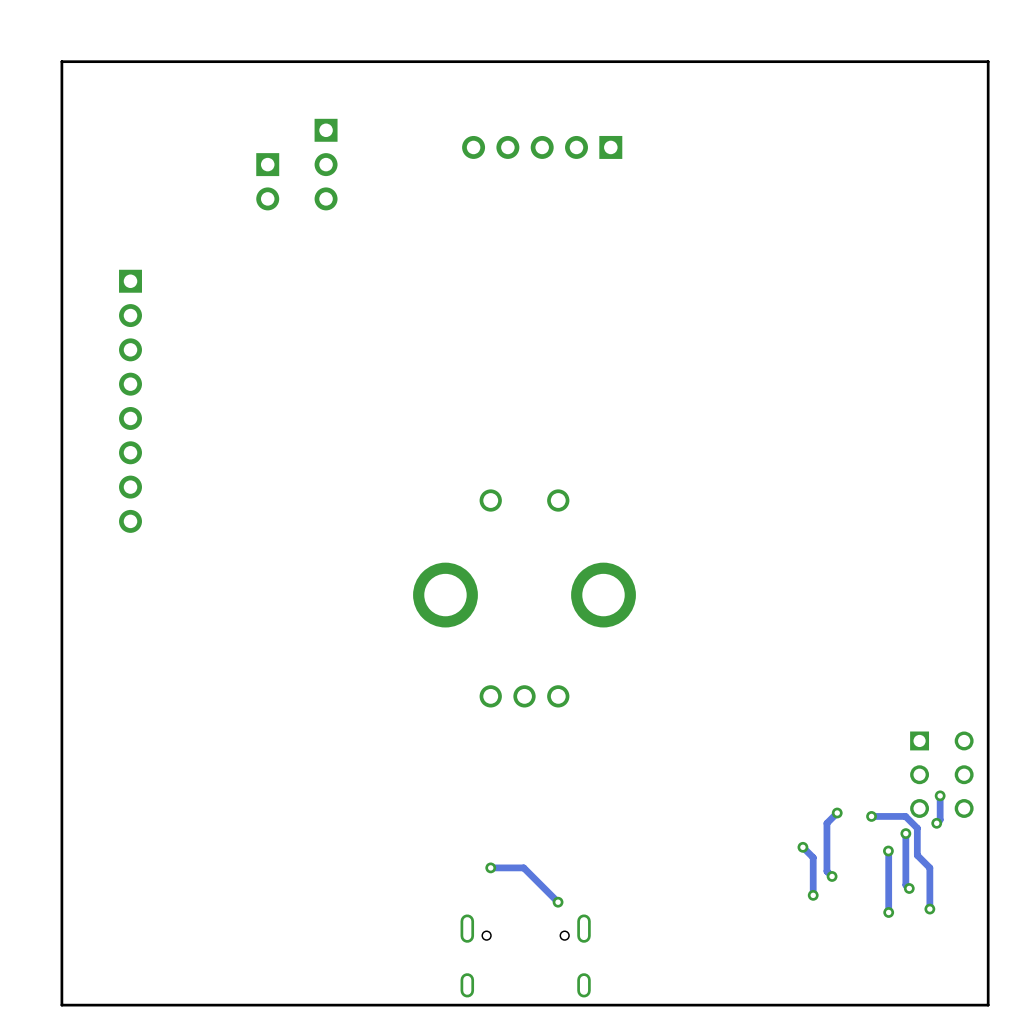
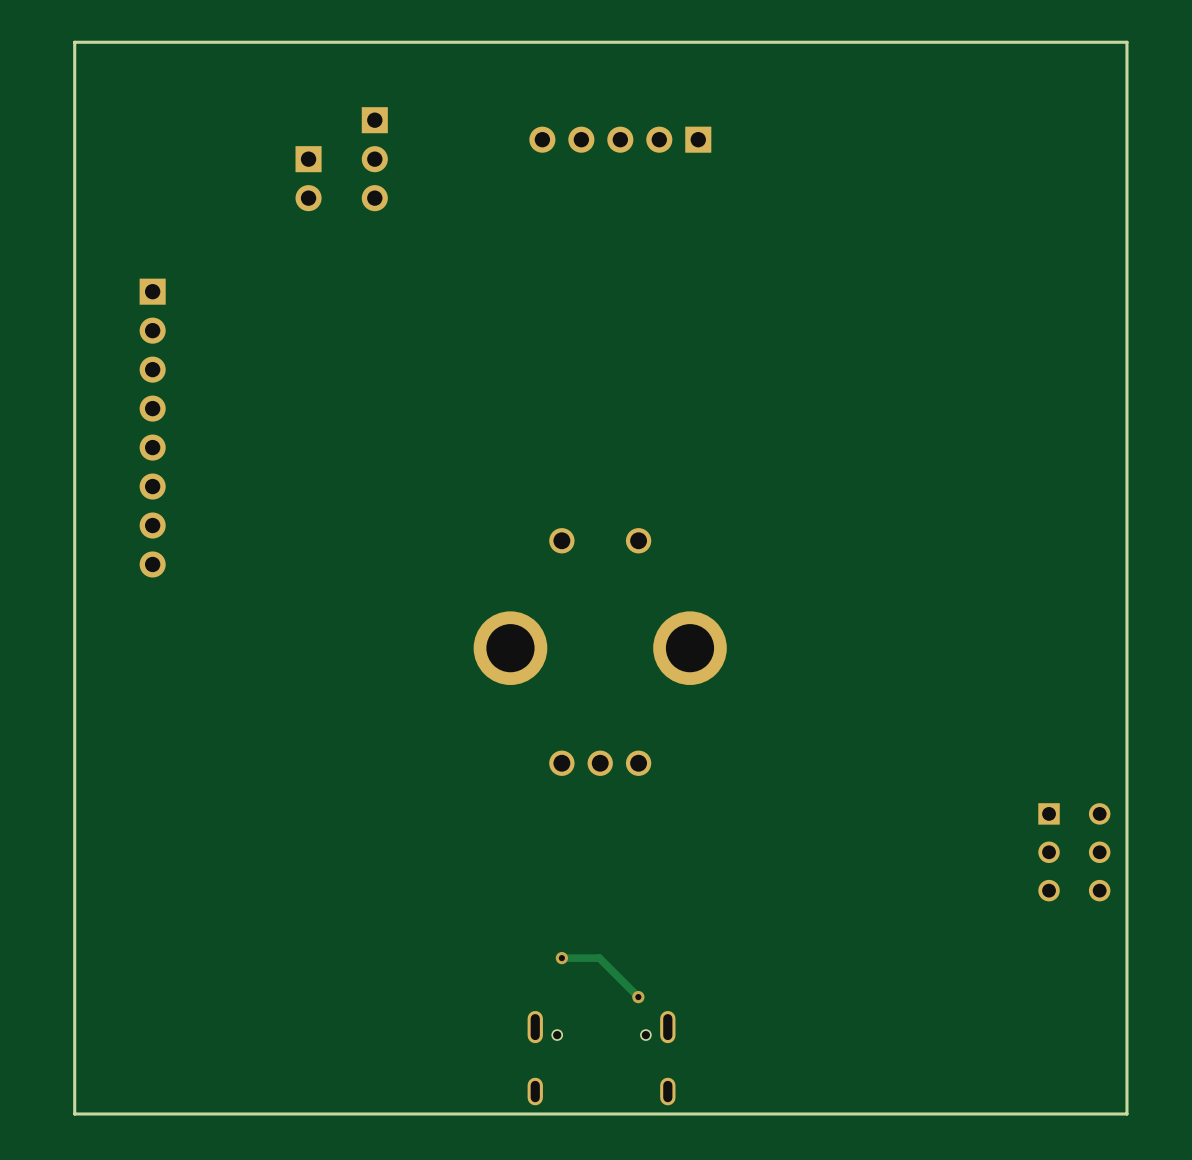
track: (940, 795) (940, 819) (936, 823) -> none
via: (940, 795) -> none
track: (837, 813) (826, 823) (826, 871) (832, 876) -> none
via: (837, 813) -> none
track: (871, 816) (905, 816) (917, 828) (917, 855) (929, 867) (929, 909) -> none
via: (871, 816) -> none
via: (936, 823) -> none
track: (905, 833) (905, 885) (909, 888) -> none
via: (905, 833) -> none
track: (802, 847) (813, 857) (813, 895) -> none
via: (802, 847) -> none
track: (888, 851) (888, 912) -> none
via: (888, 851) -> none
via: (832, 876) -> none
via: (909, 888) -> none
via: (813, 895) -> none
via: (929, 909) -> none
via: (888, 912) -> none

